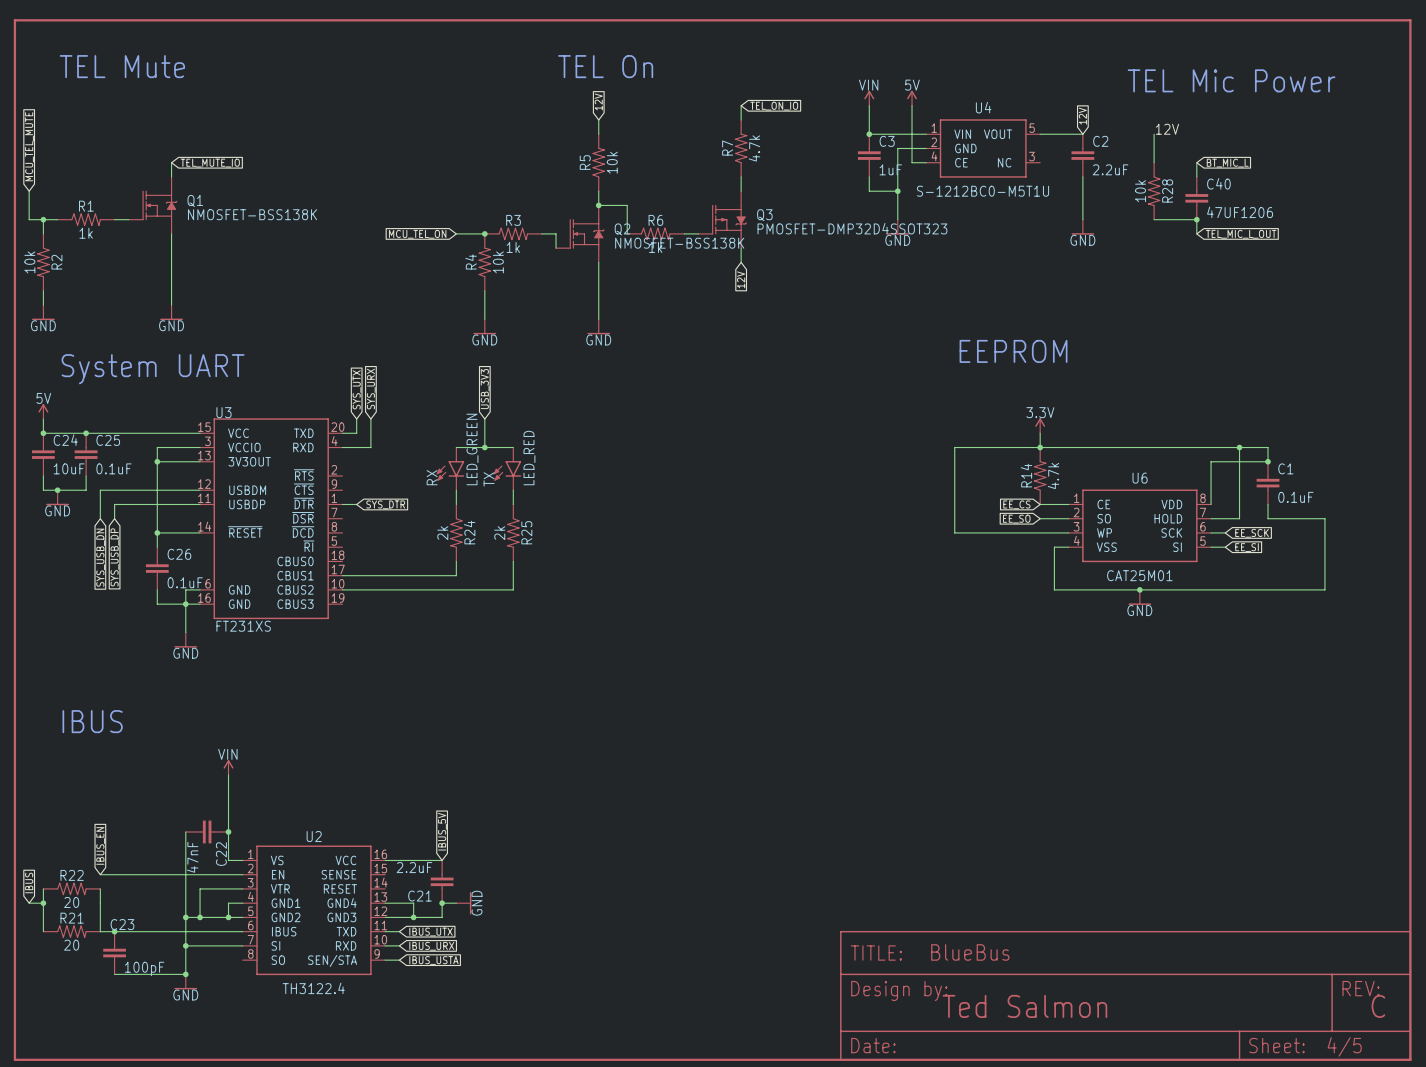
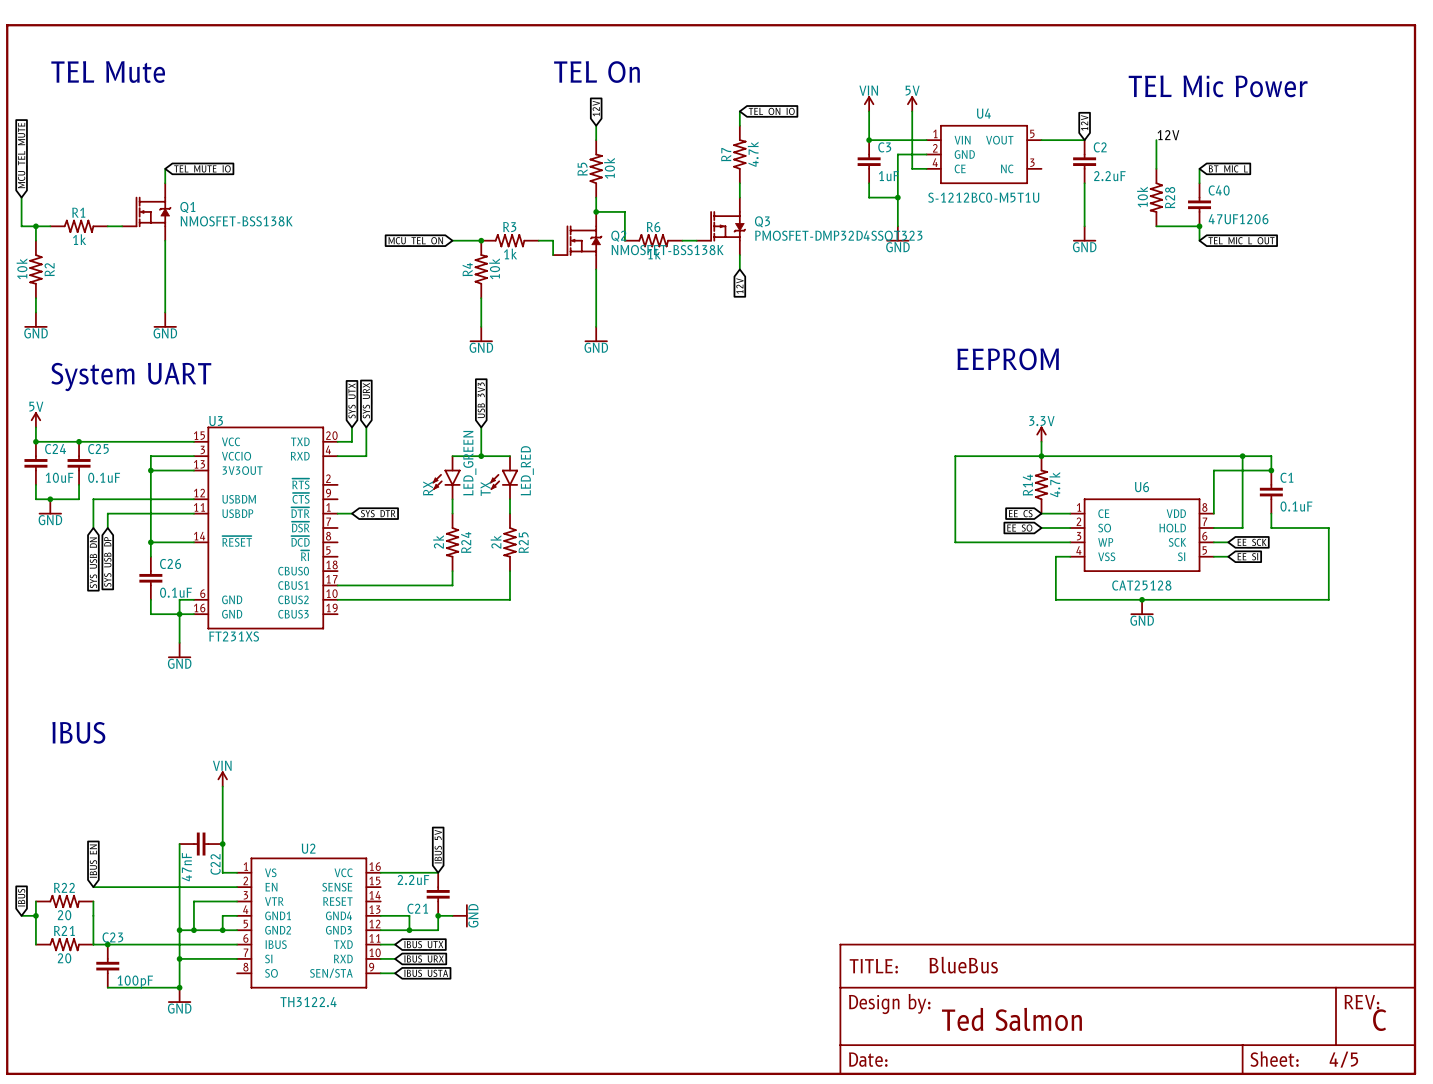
U6 value: CAT25M01 (1139, 575) -> CAT25128 (1141, 585)

